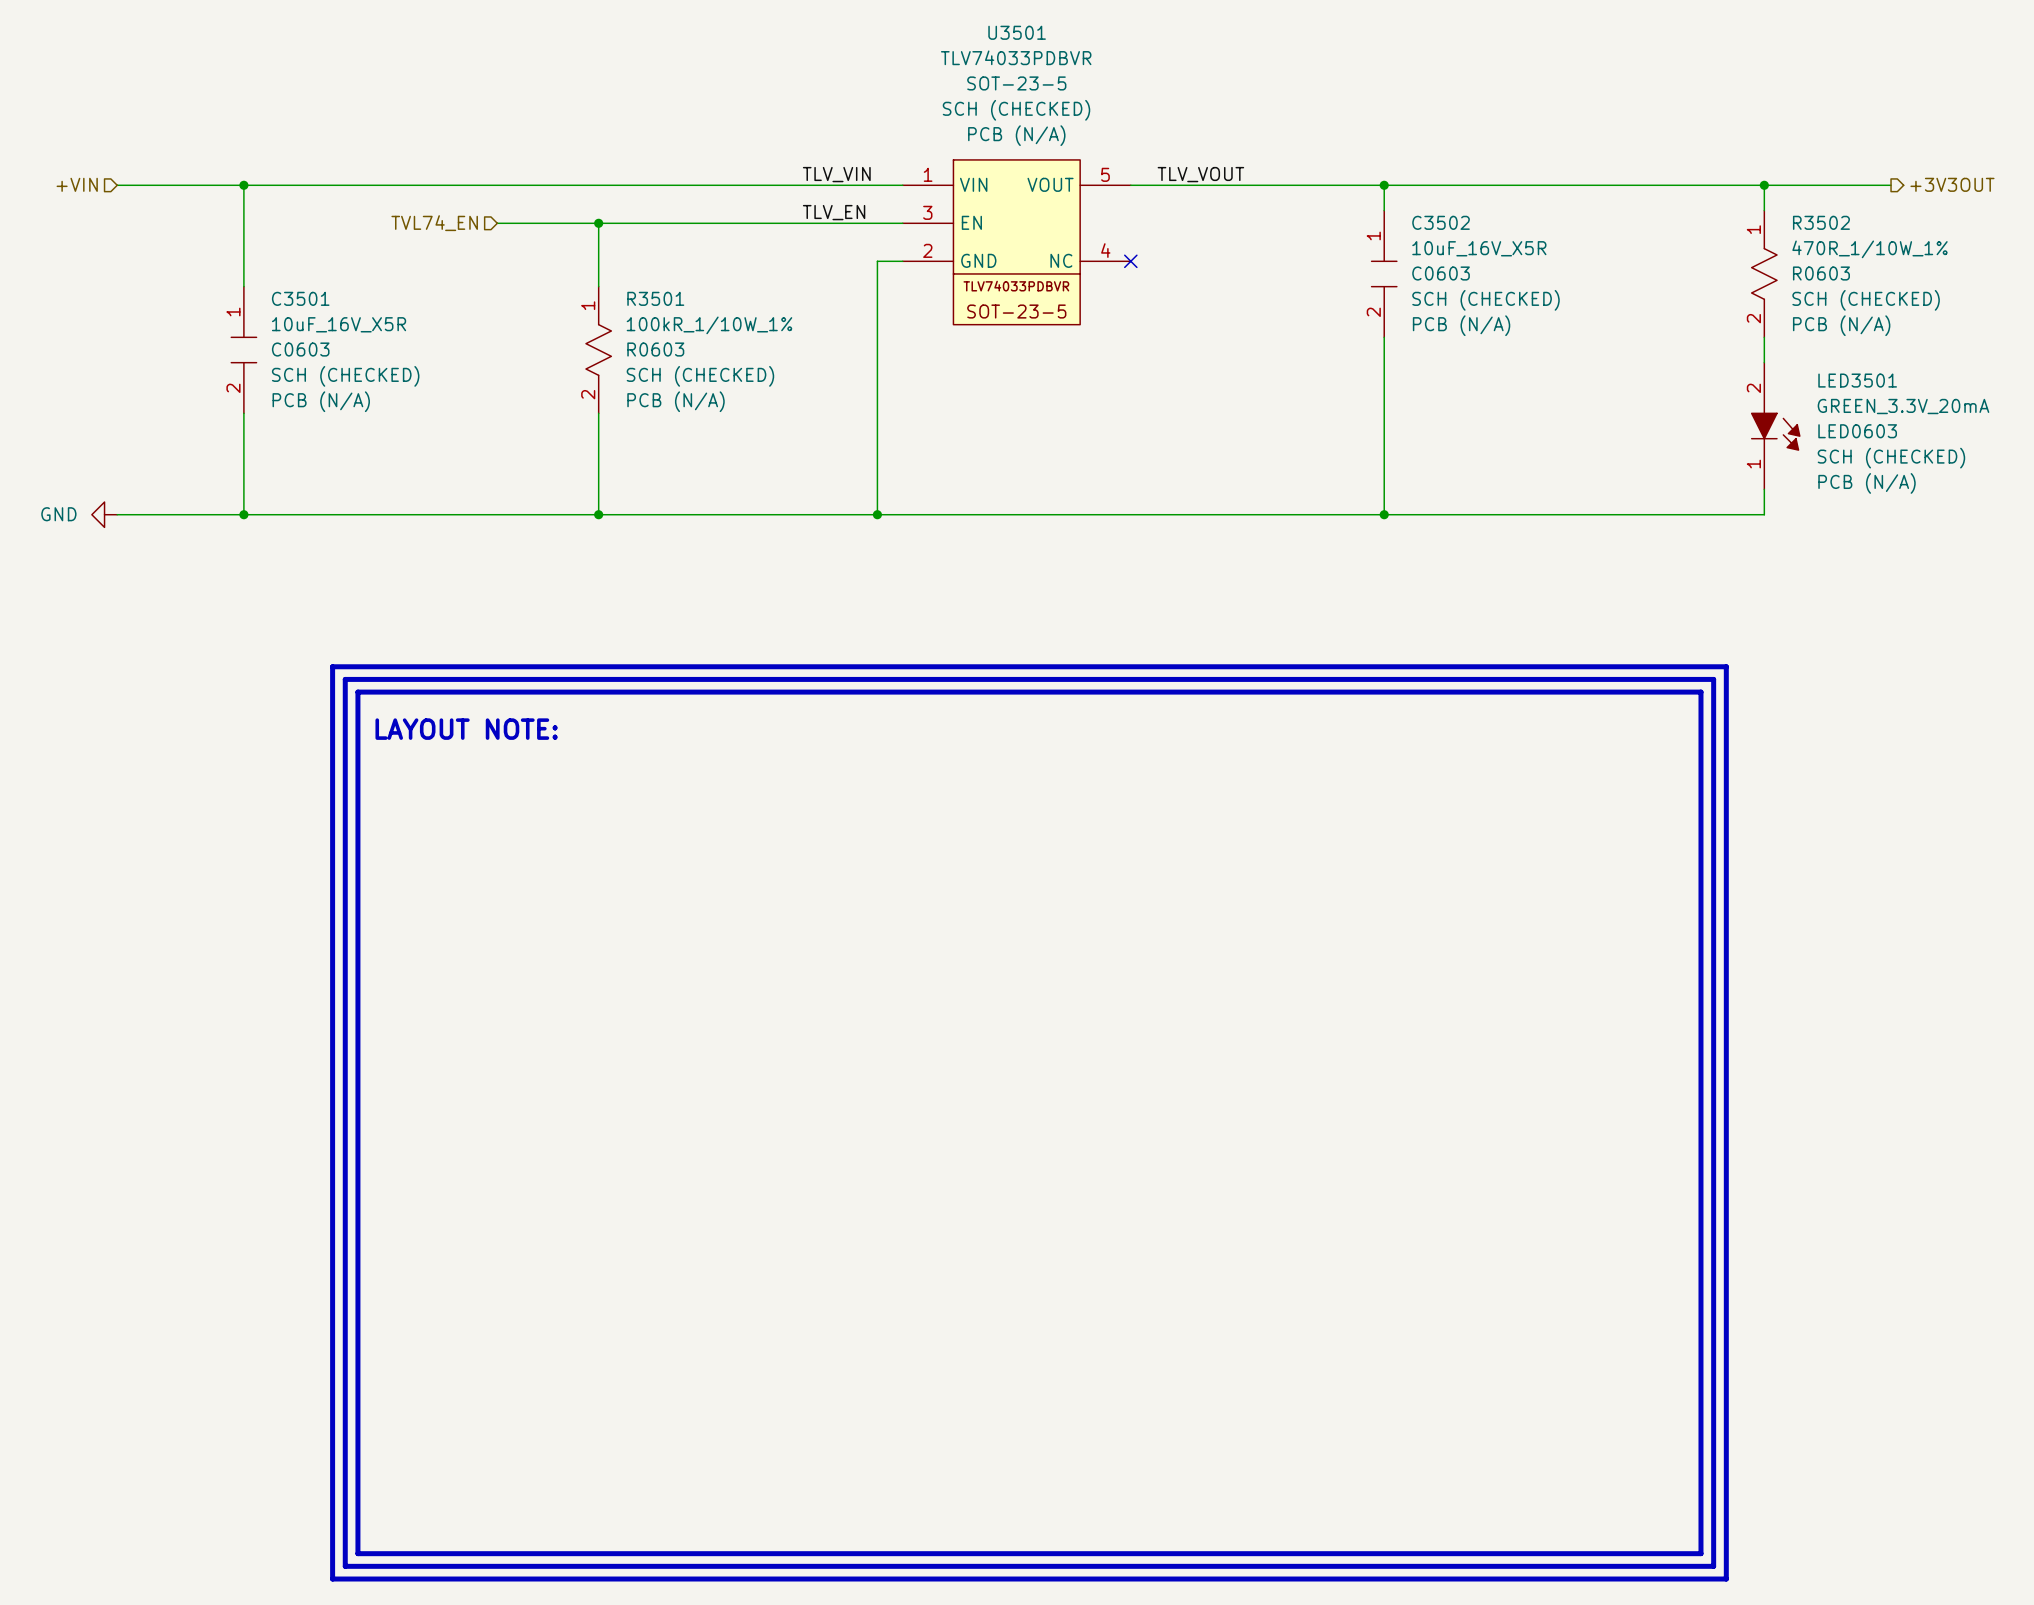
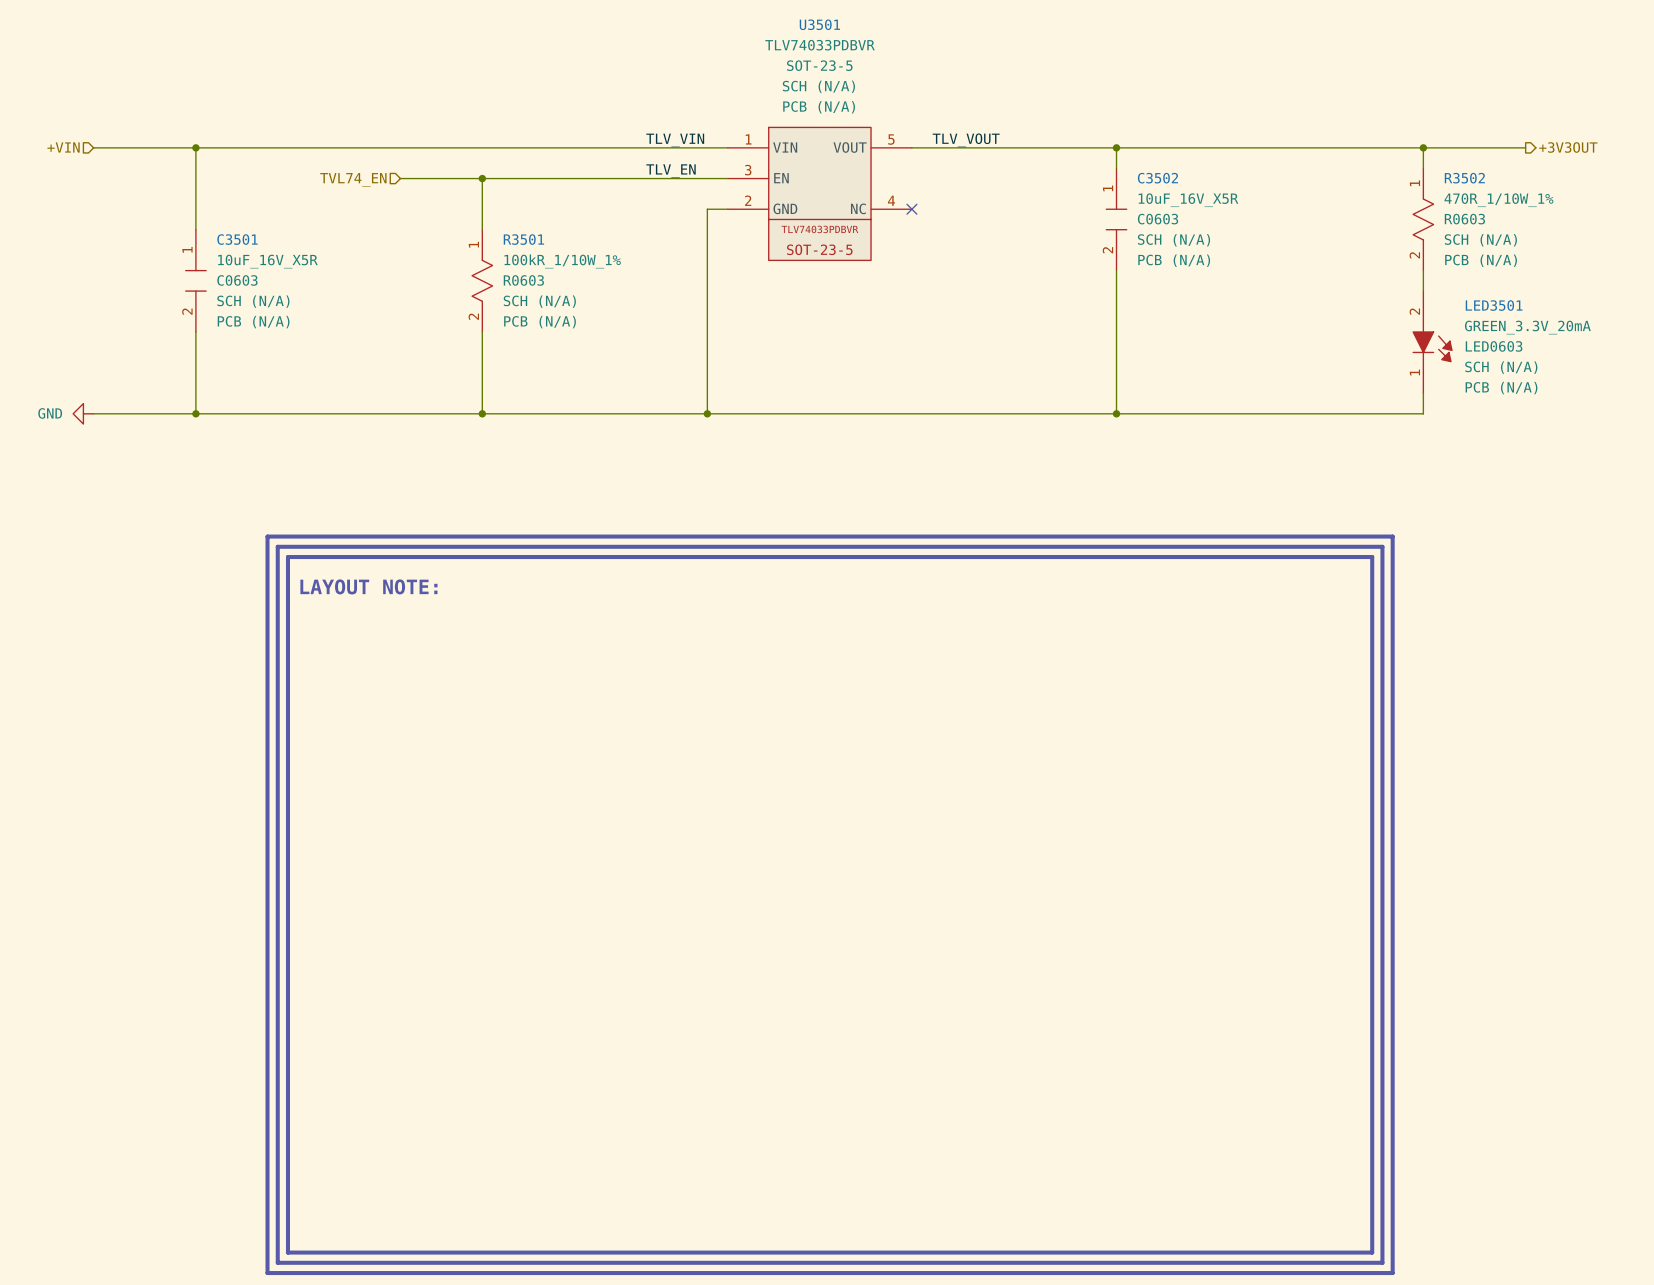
U3501 text: SCH (CHECKED) (1016, 110) -> SCH (N/A) (818, 86)
C3502 text: SCH (CHECKED) (1485, 300) -> SCH (N/A) (1173, 240)
R3502 text: SCH (CHECKED) (1866, 300) -> SCH (N/A) (1480, 240)
C3501 text: SCH (CHECKED) (345, 376) -> SCH (N/A) (253, 301)
R3501 text: SCH (CHECKED) (700, 376) -> SCH (N/A) (539, 301)
LED3501 text: SCH (CHECKED) (1891, 458) -> SCH (N/A) (1501, 367)

